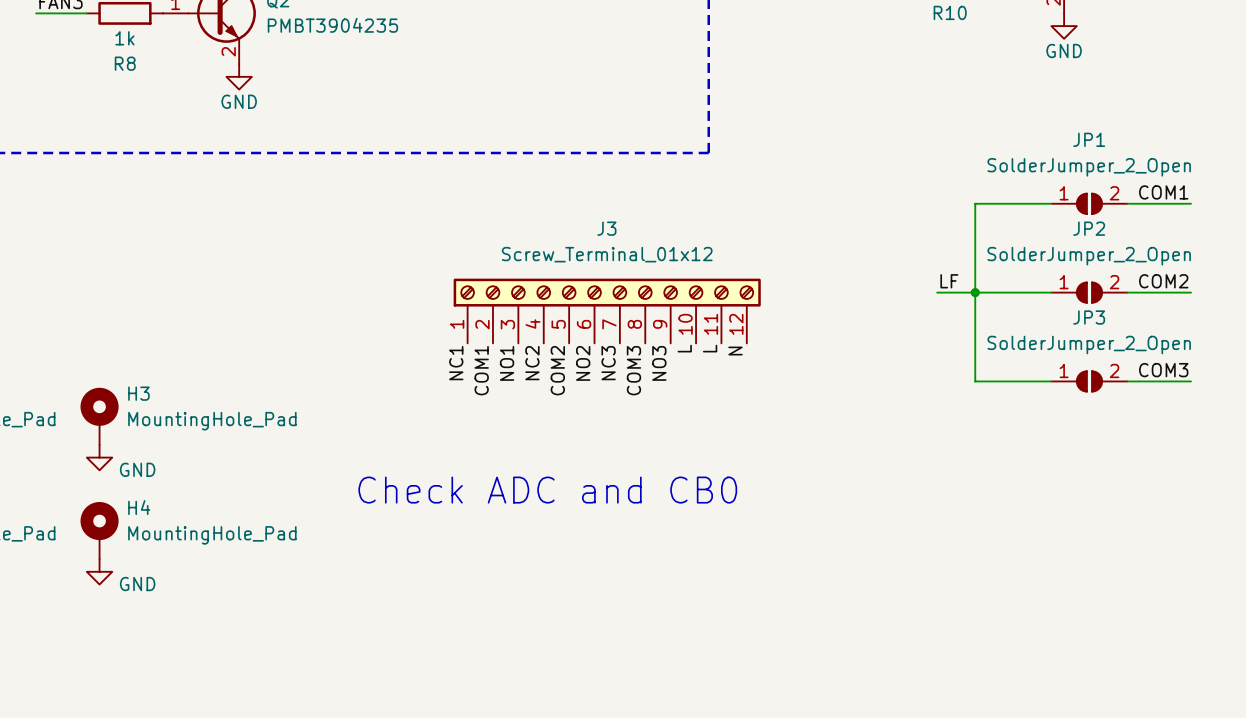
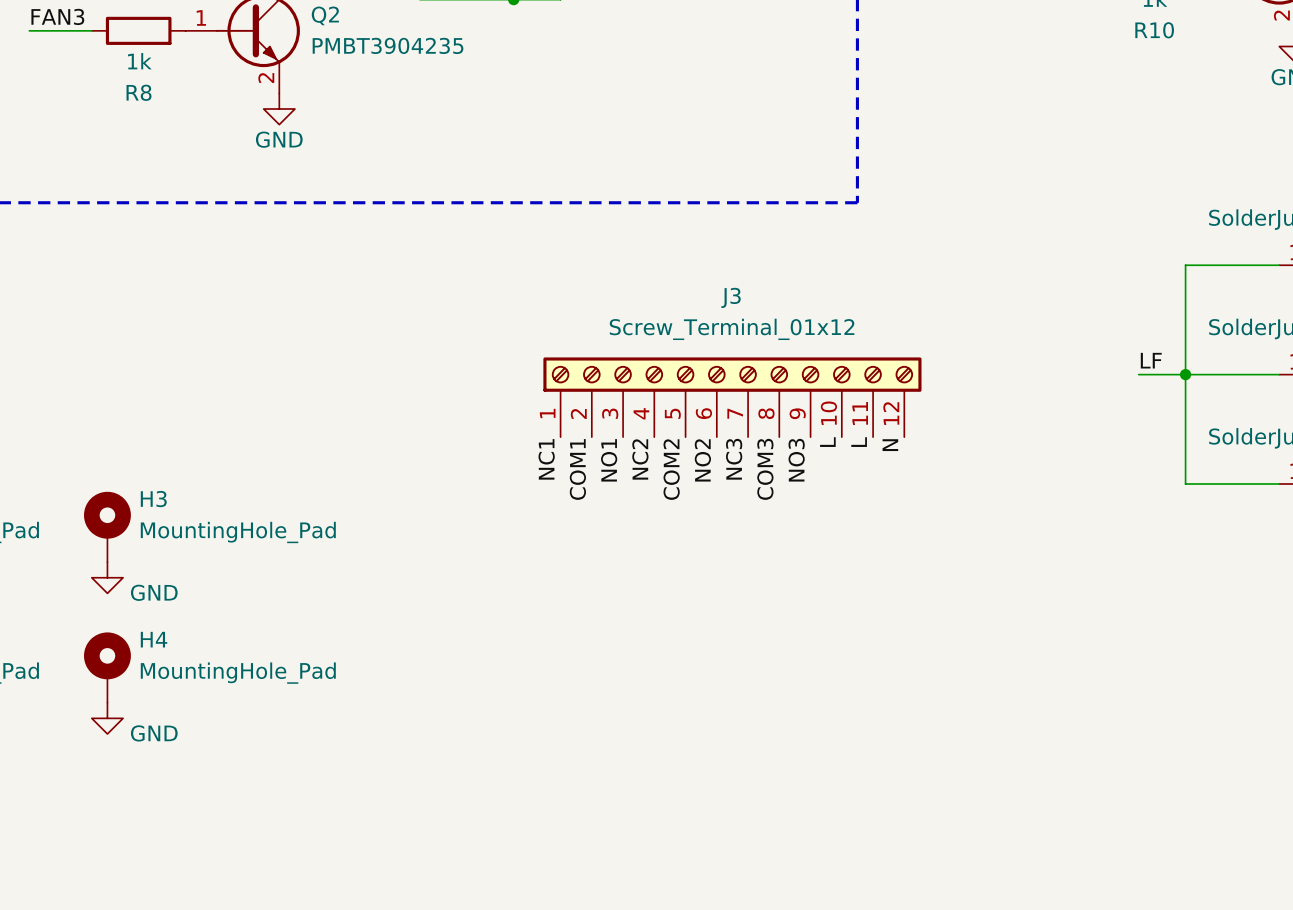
text: Check ADC and CB0 (547, 490) -> none

